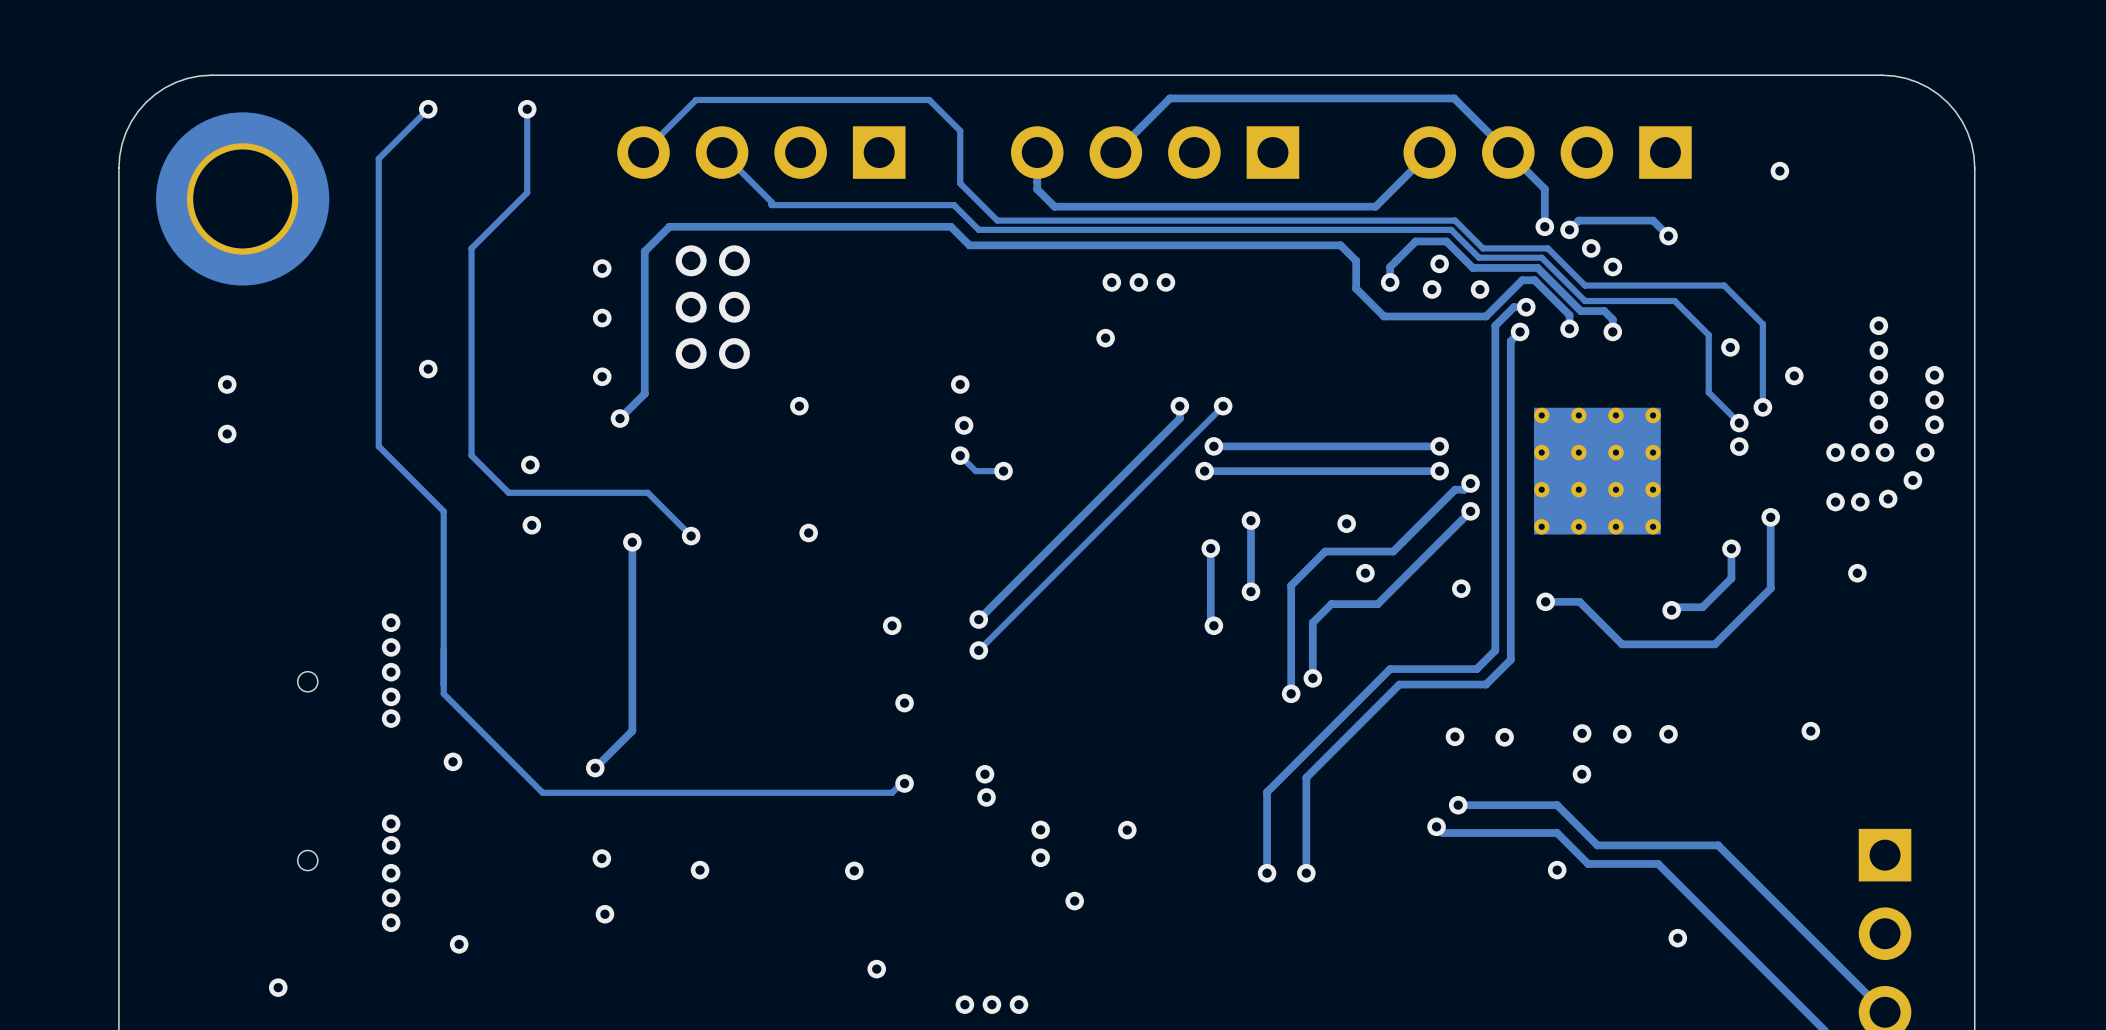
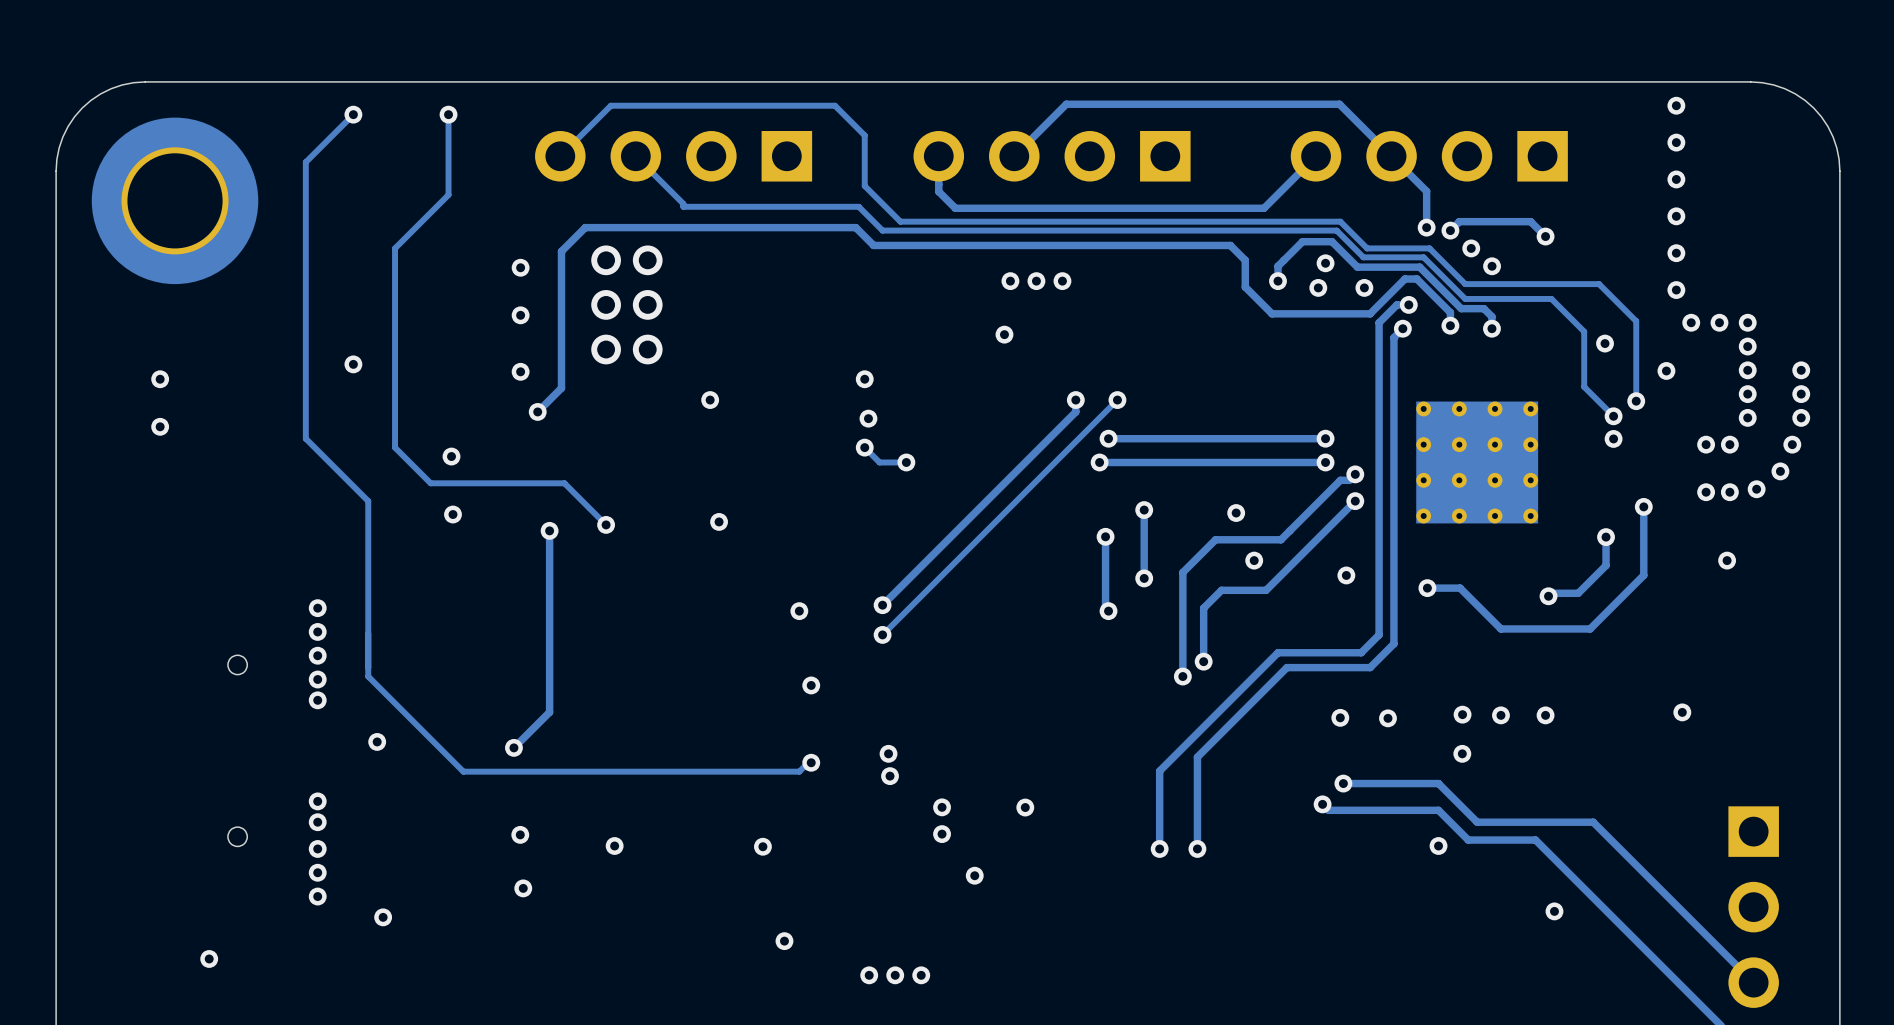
via: none -> (1676, 105)
via: none -> (1676, 142)
via: (1779, 171) -> none
via: none -> (1676, 179)
via: none -> (1676, 216)
via: none -> (1676, 253)
via: none -> (1676, 290)
via: none -> (1691, 322)
via: none -> (1719, 322)
via: (1885, 452) -> none

